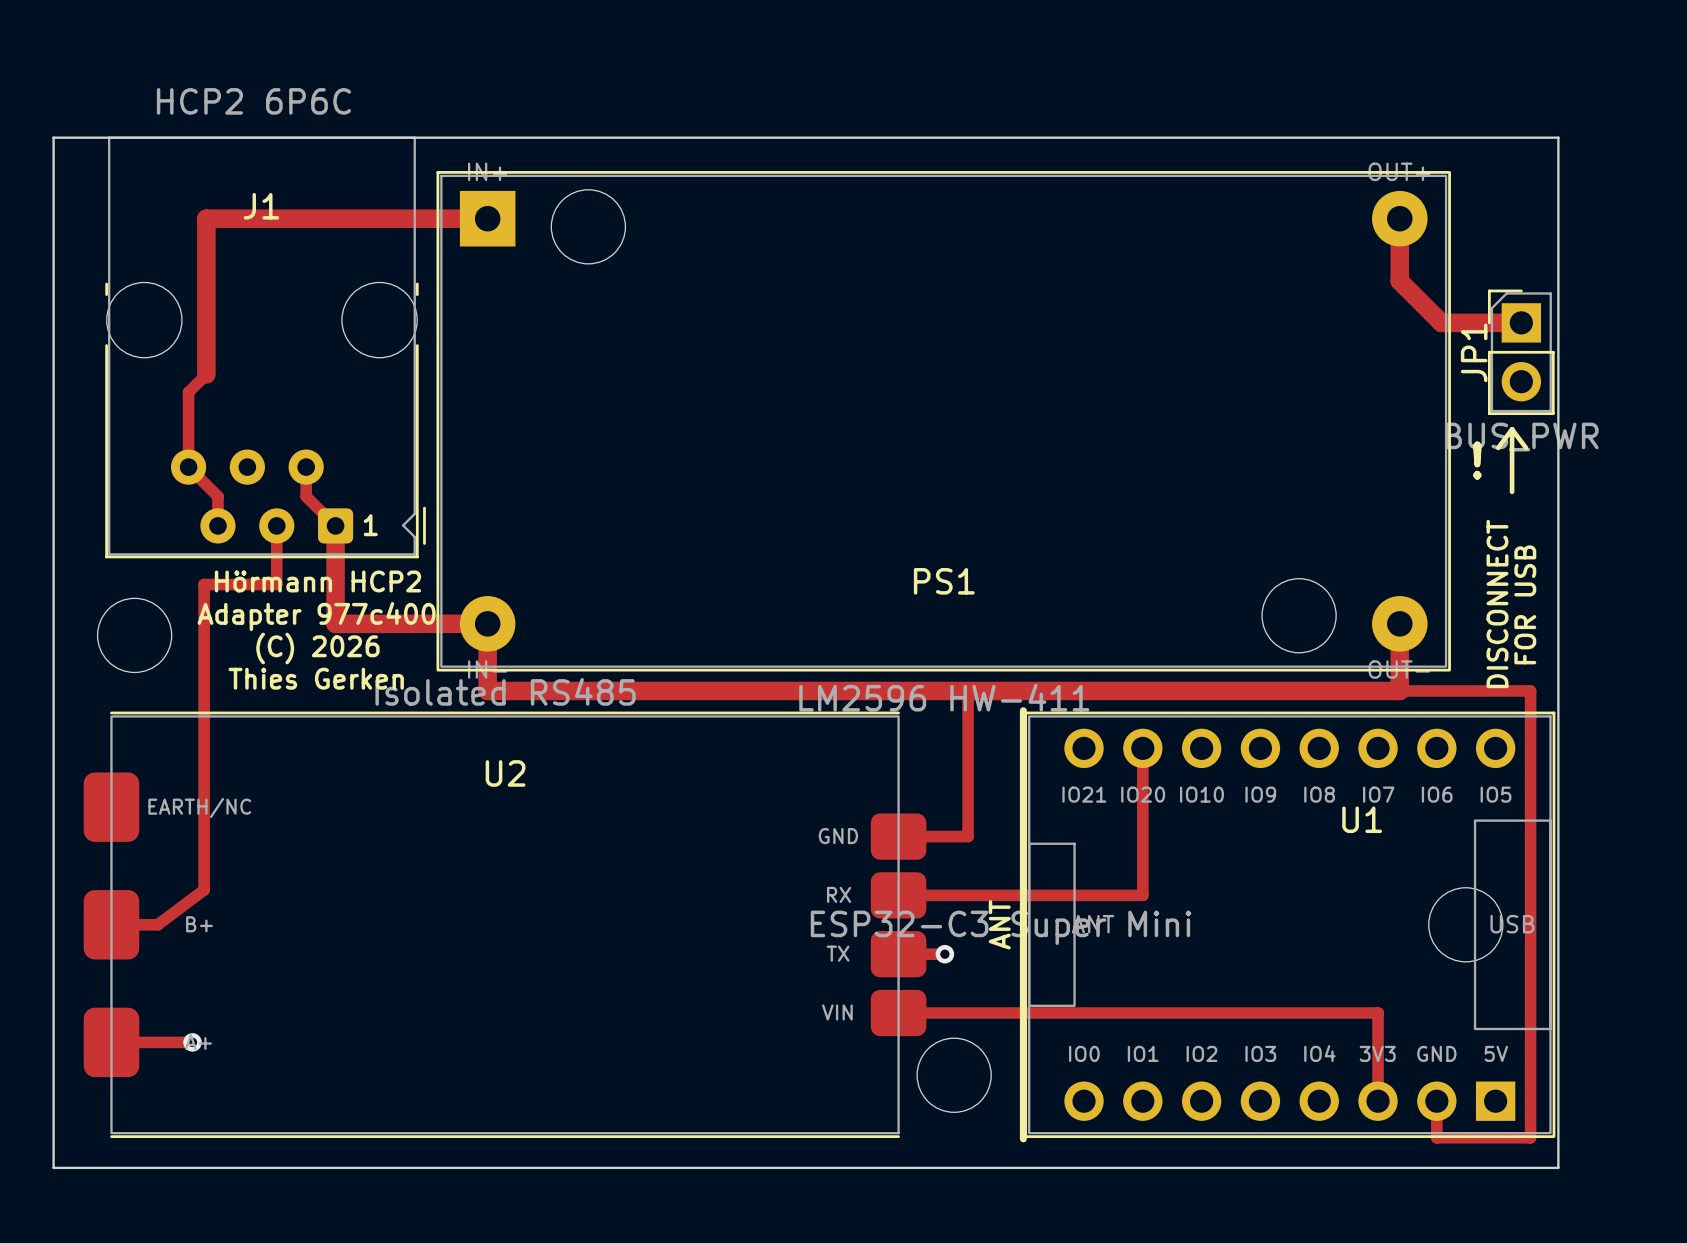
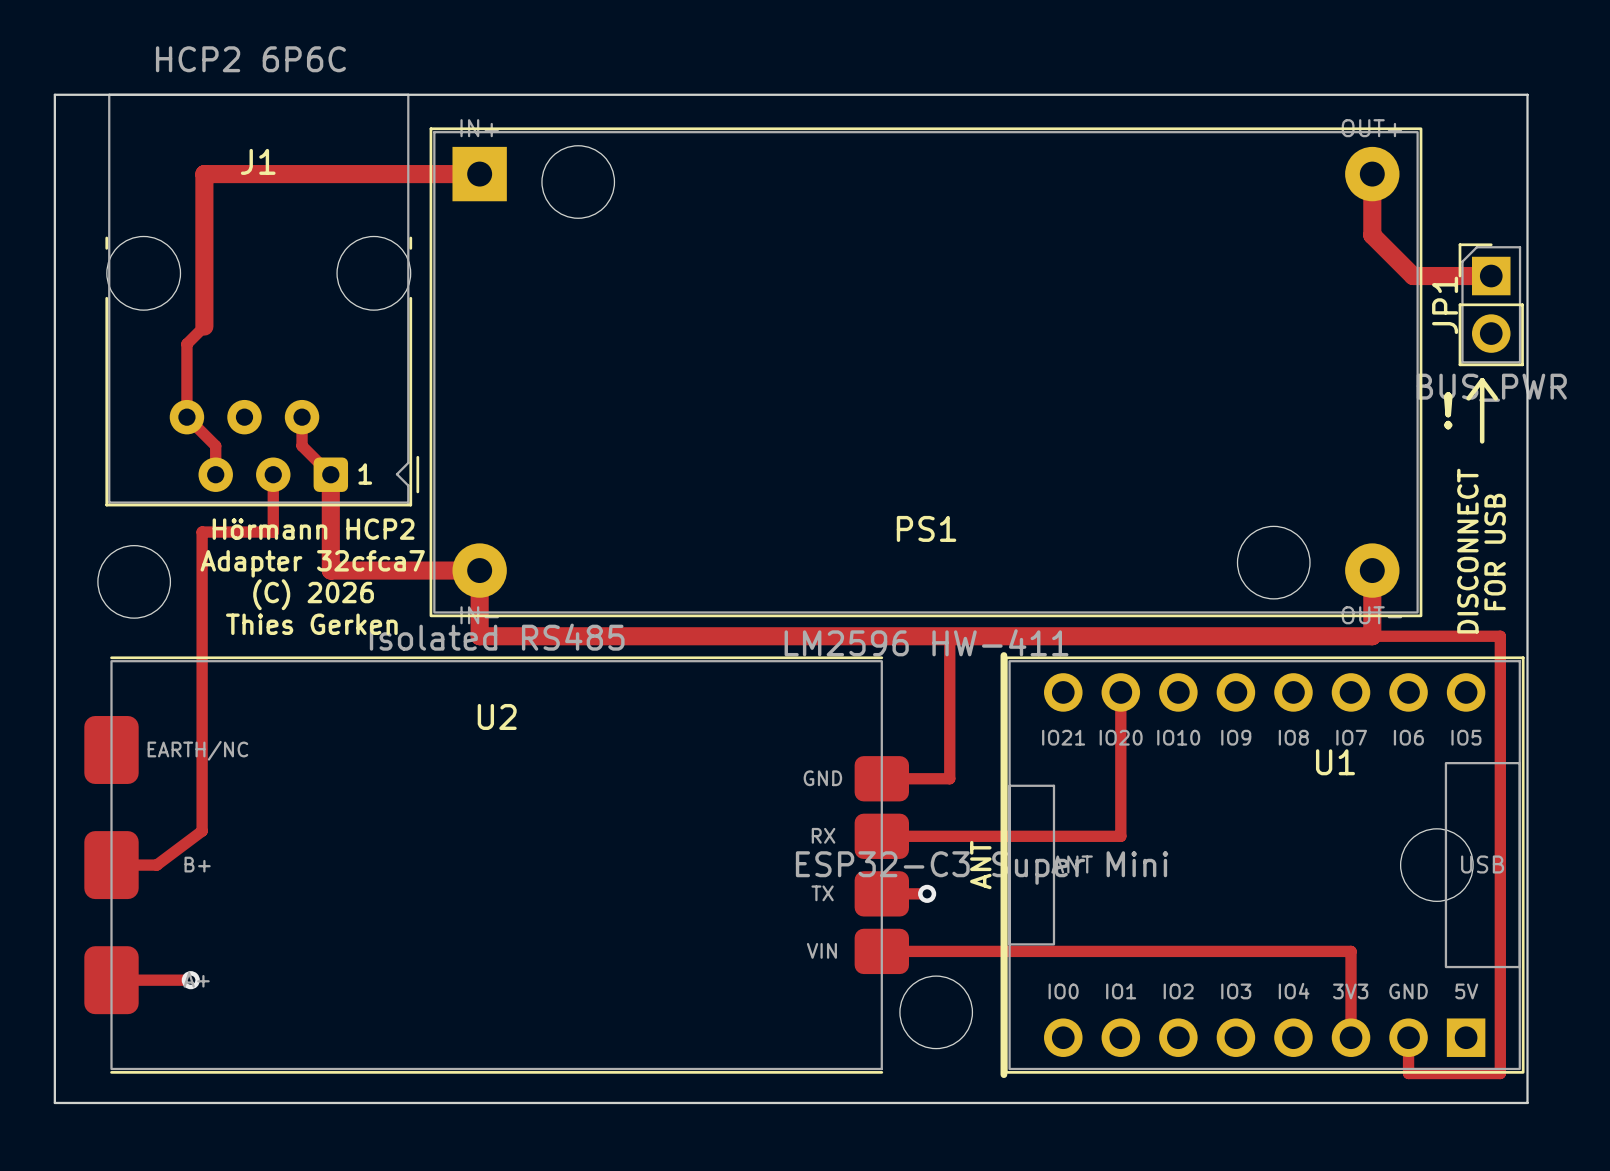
text: Adapter 977c400 (316, 616) -> Adapter 32cfca7 (312, 563)

